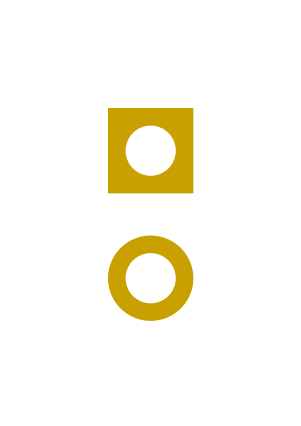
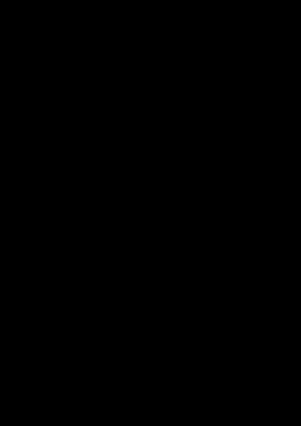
part: (150, 214) -> none

